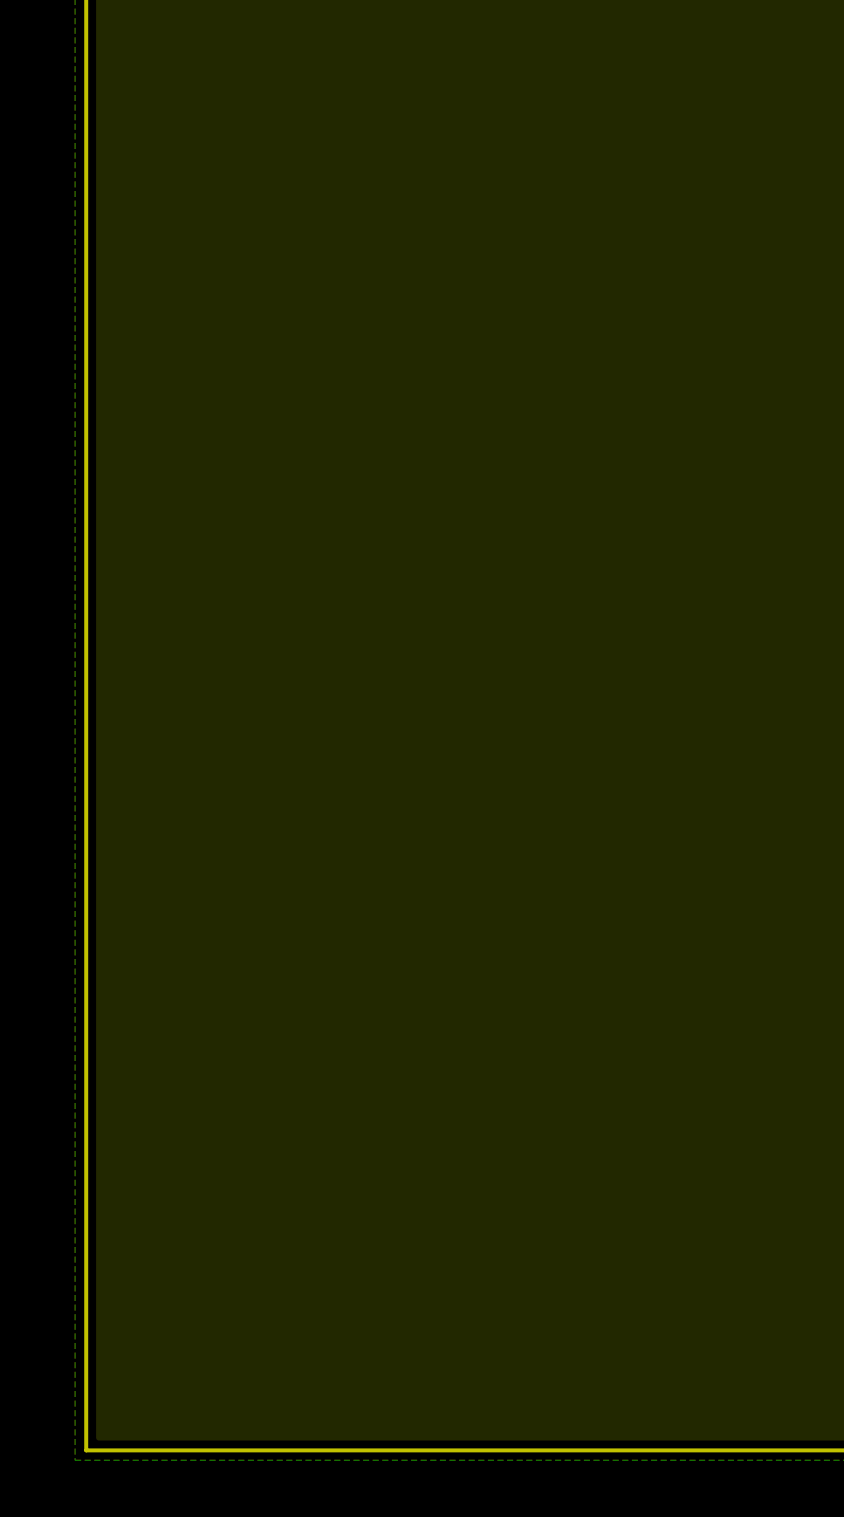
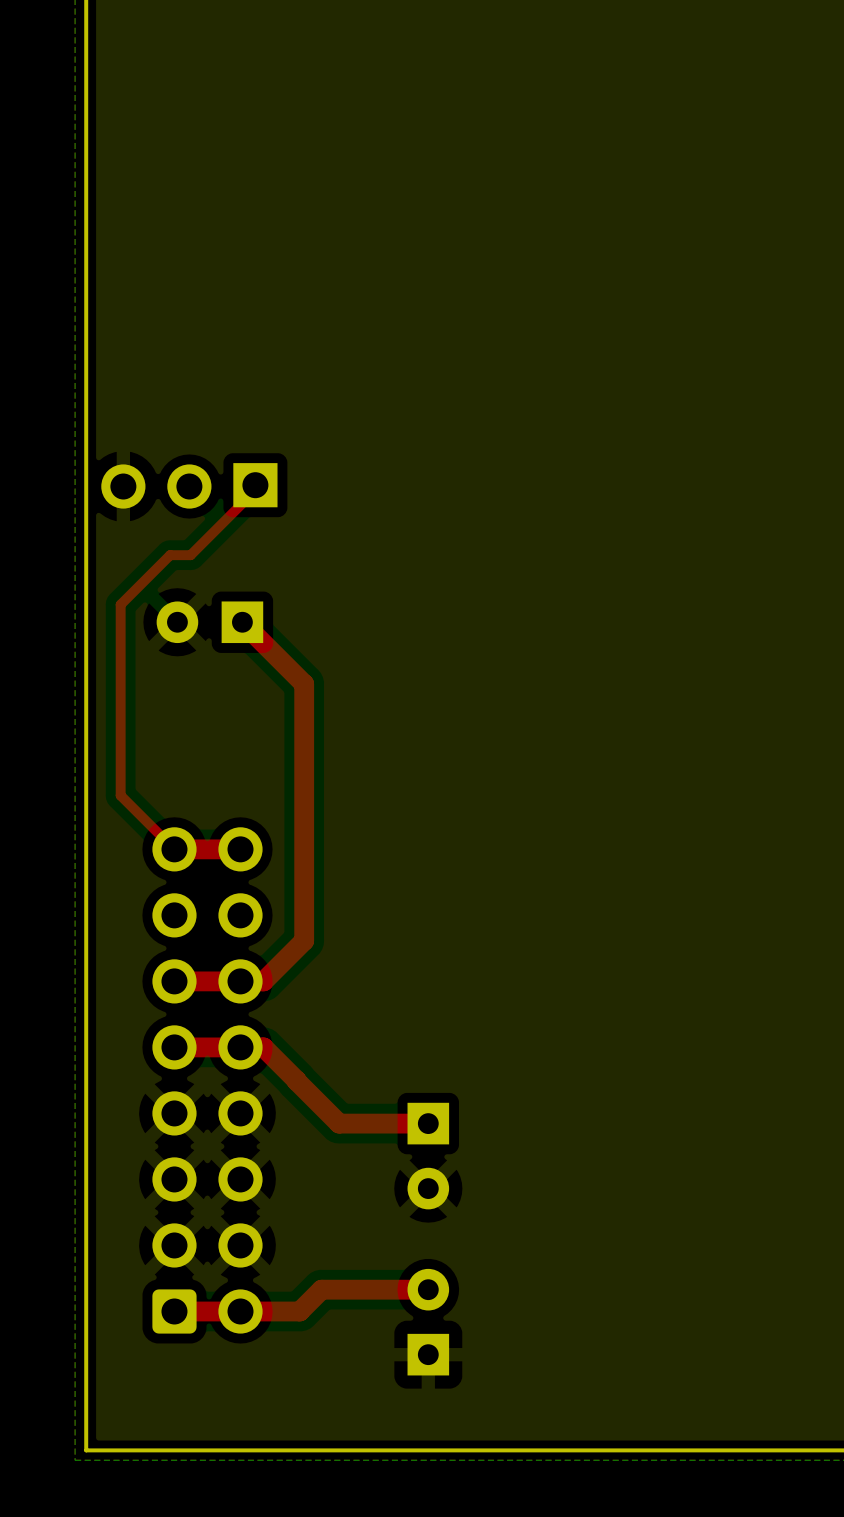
part: none -> (189, 485)
top track: none -> (255, 485) (255, 490) (190, 555) (170, 555) (120, 604) (120, 795) (174, 849) (240, 849)
part: none -> (209, 622)
top track: none -> (242, 622) (304, 684) (304, 940) (263, 981) (174, 981)
top track: none -> (174, 1047) (263, 1047) (339, 1123) (428, 1123)
part: none -> (207, 1080)
part: none -> (428, 1156)
top track: none -> (428, 1289) (321, 1289) (299, 1311) (174, 1311)
part: none -> (428, 1322)

